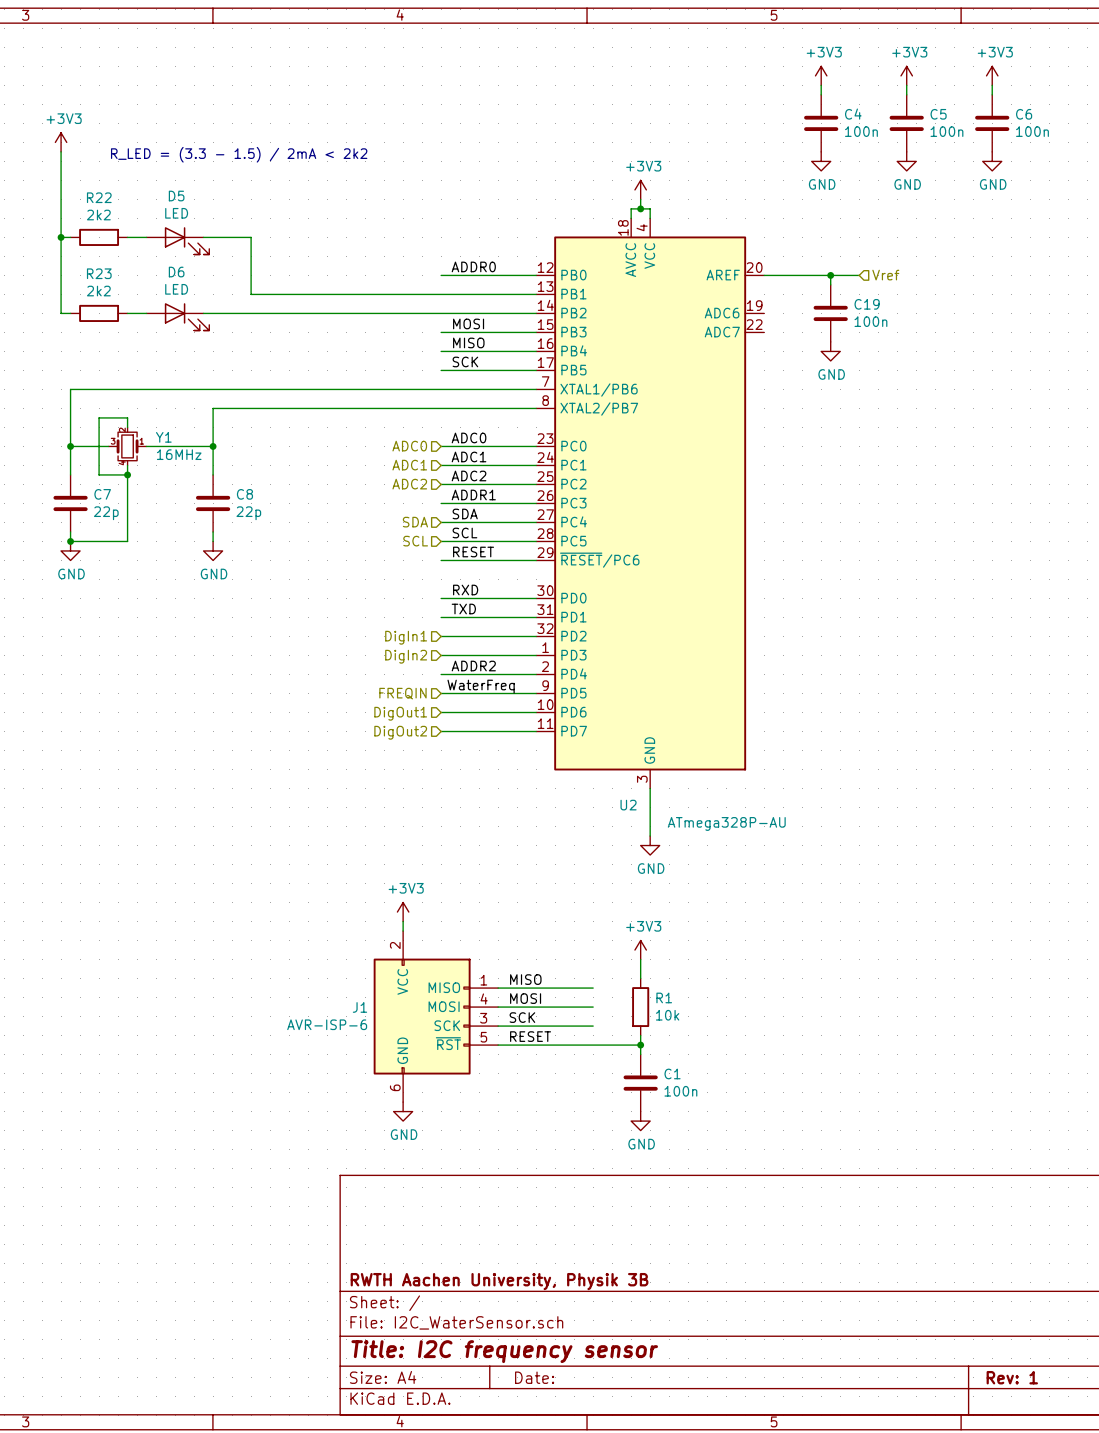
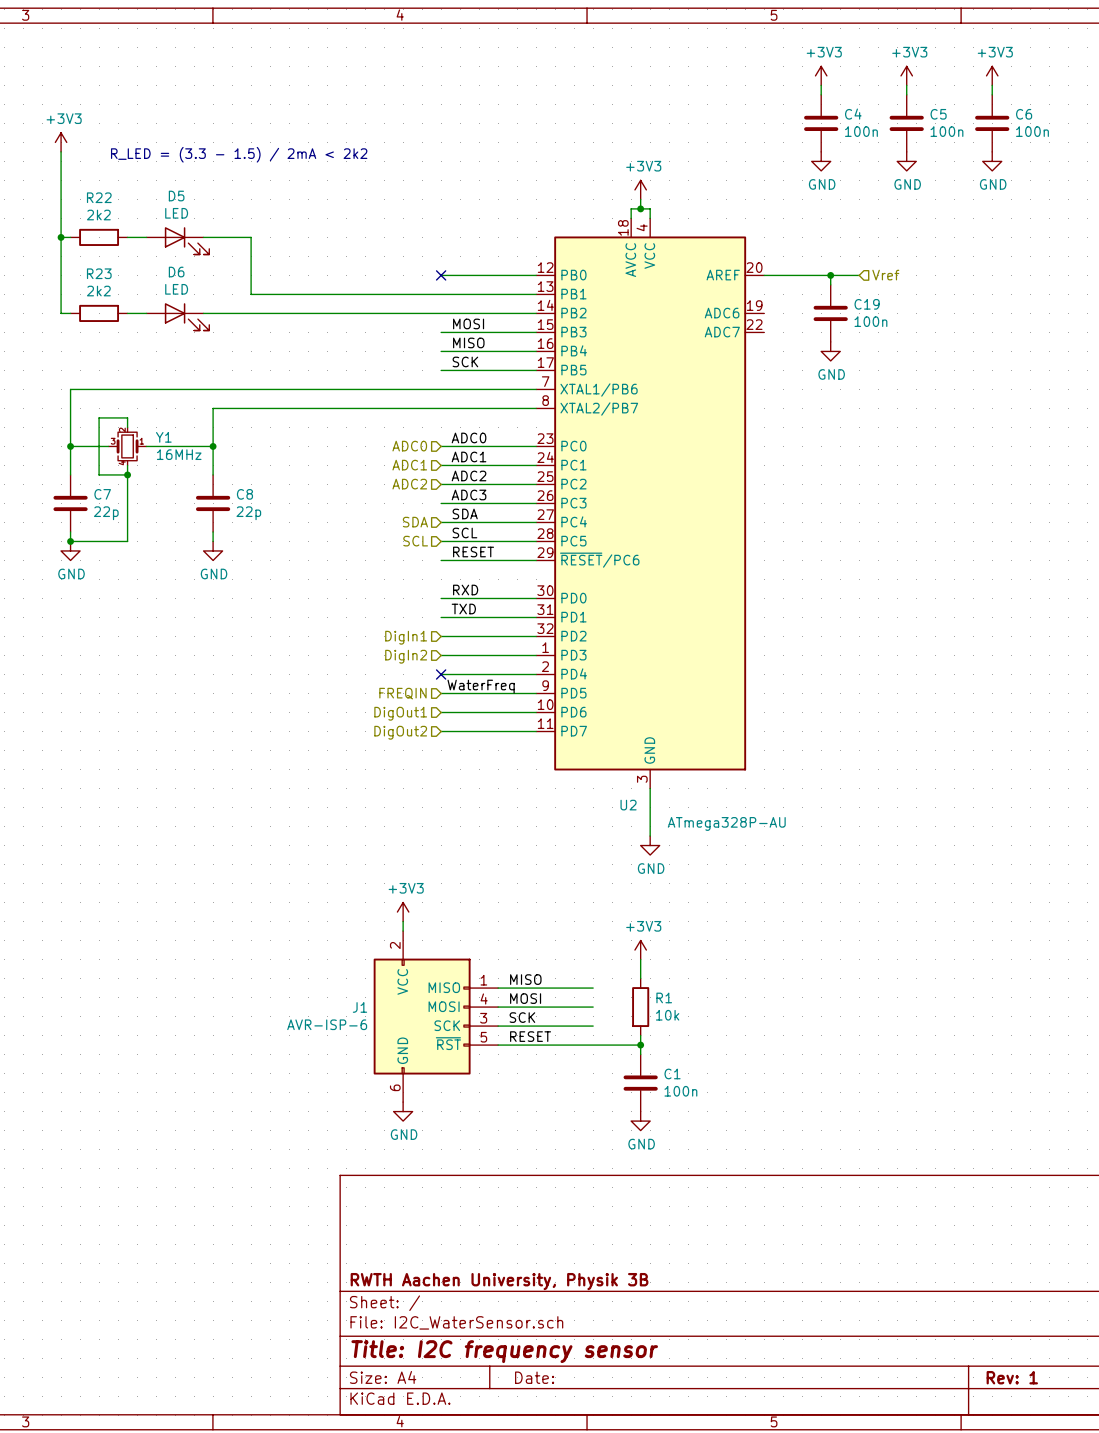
label: ADDR0 (473, 266) -> none
no-connect mark: none -> (441, 275)
label: ADDR1 (473, 494) -> ADC3 (469, 494)
label: ADDR2 (473, 666) -> none
no-connect mark: none -> (441, 674)

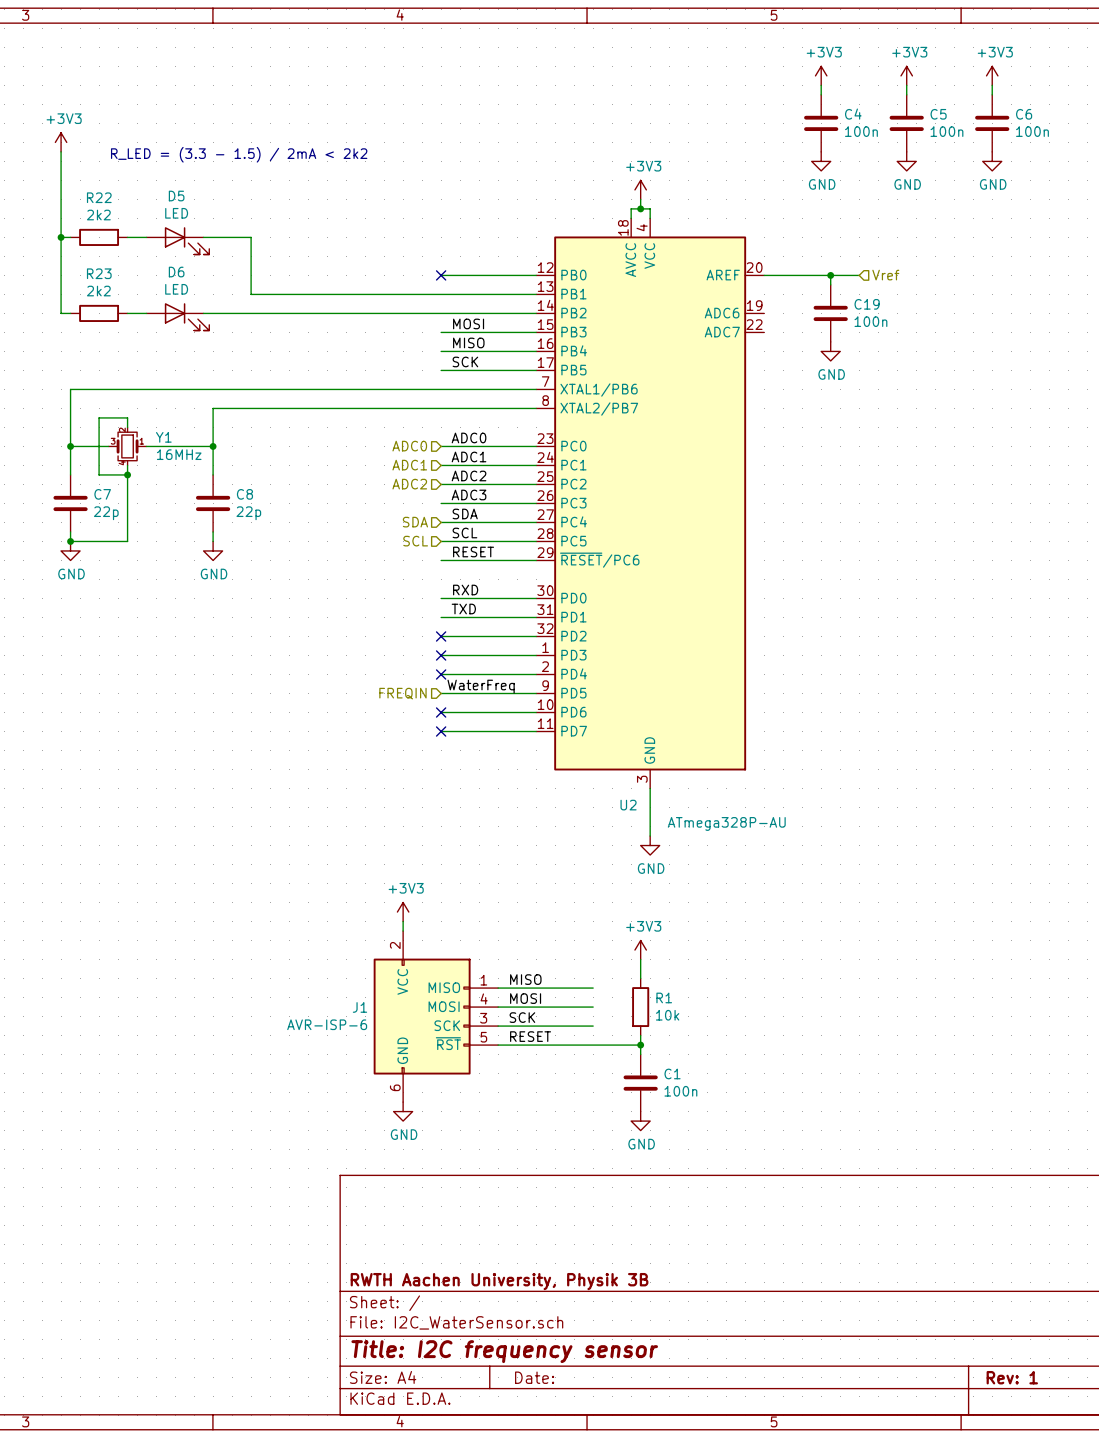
no-connect mark: none -> (441, 636)
hierarchical label: DigIn1 (406, 637) -> none
no-connect mark: none -> (441, 655)
hierarchical label: DigIn2 (406, 656) -> none
no-connect mark: none -> (441, 712)
hierarchical label: DigOut1 (400, 713) -> none
no-connect mark: none -> (441, 731)
hierarchical label: DigOut2 (400, 732) -> none

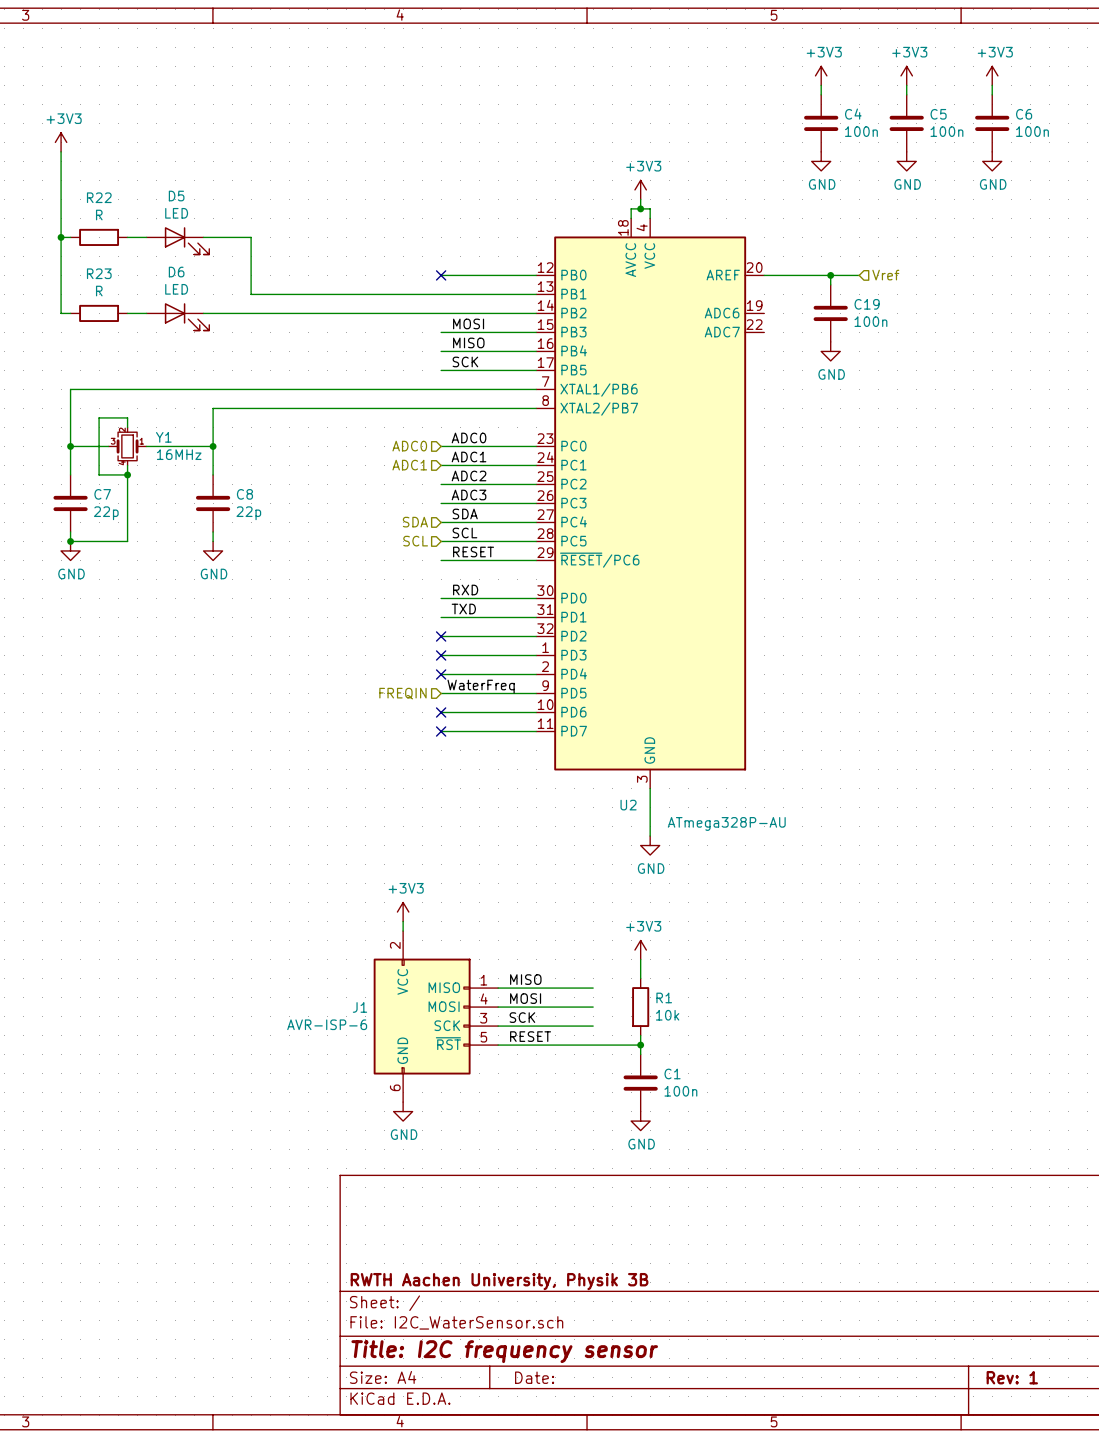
text: R_LED = (3.3 - 1.5) / 2mA < 2k2 (239, 154) -> none
R22 value: 2k2 (98, 215) -> R (99, 215)
R23 value: 2k2 (98, 291) -> R (99, 291)
hierarchical label: ADC2 (409, 484) -> none

